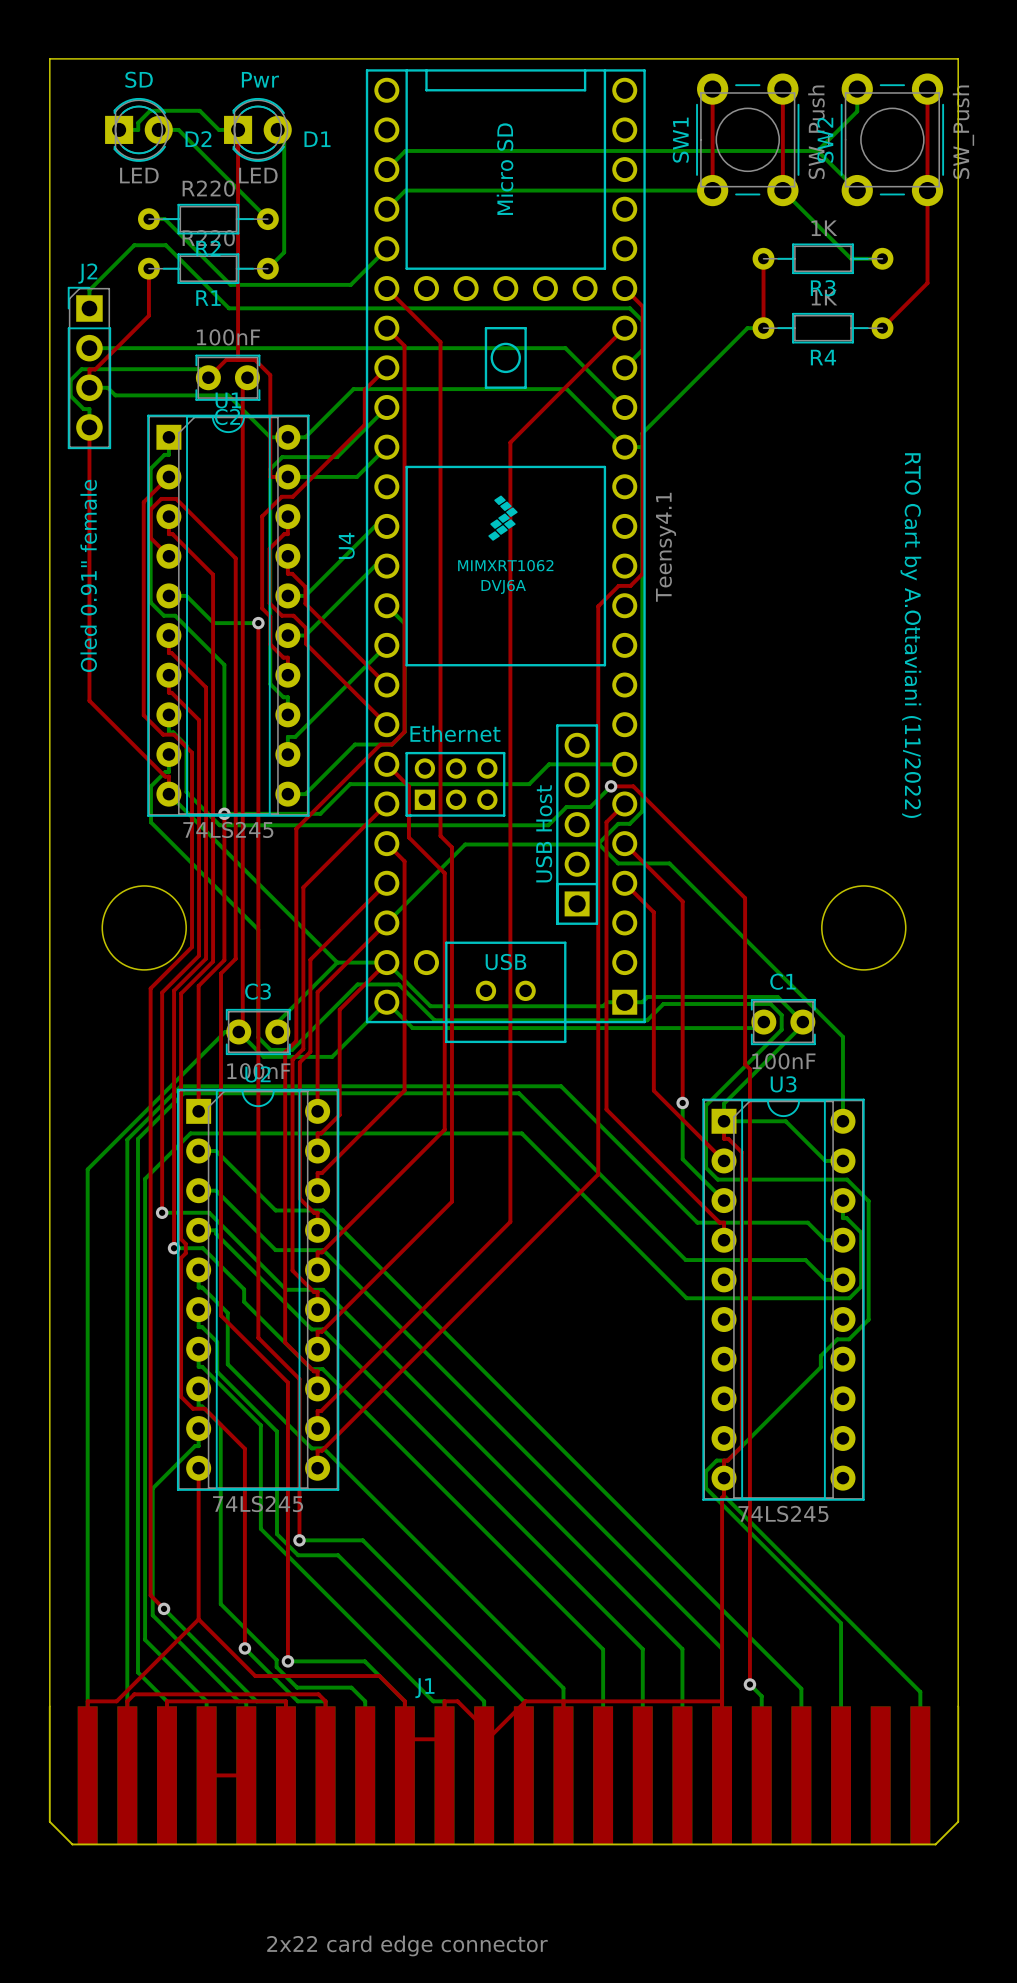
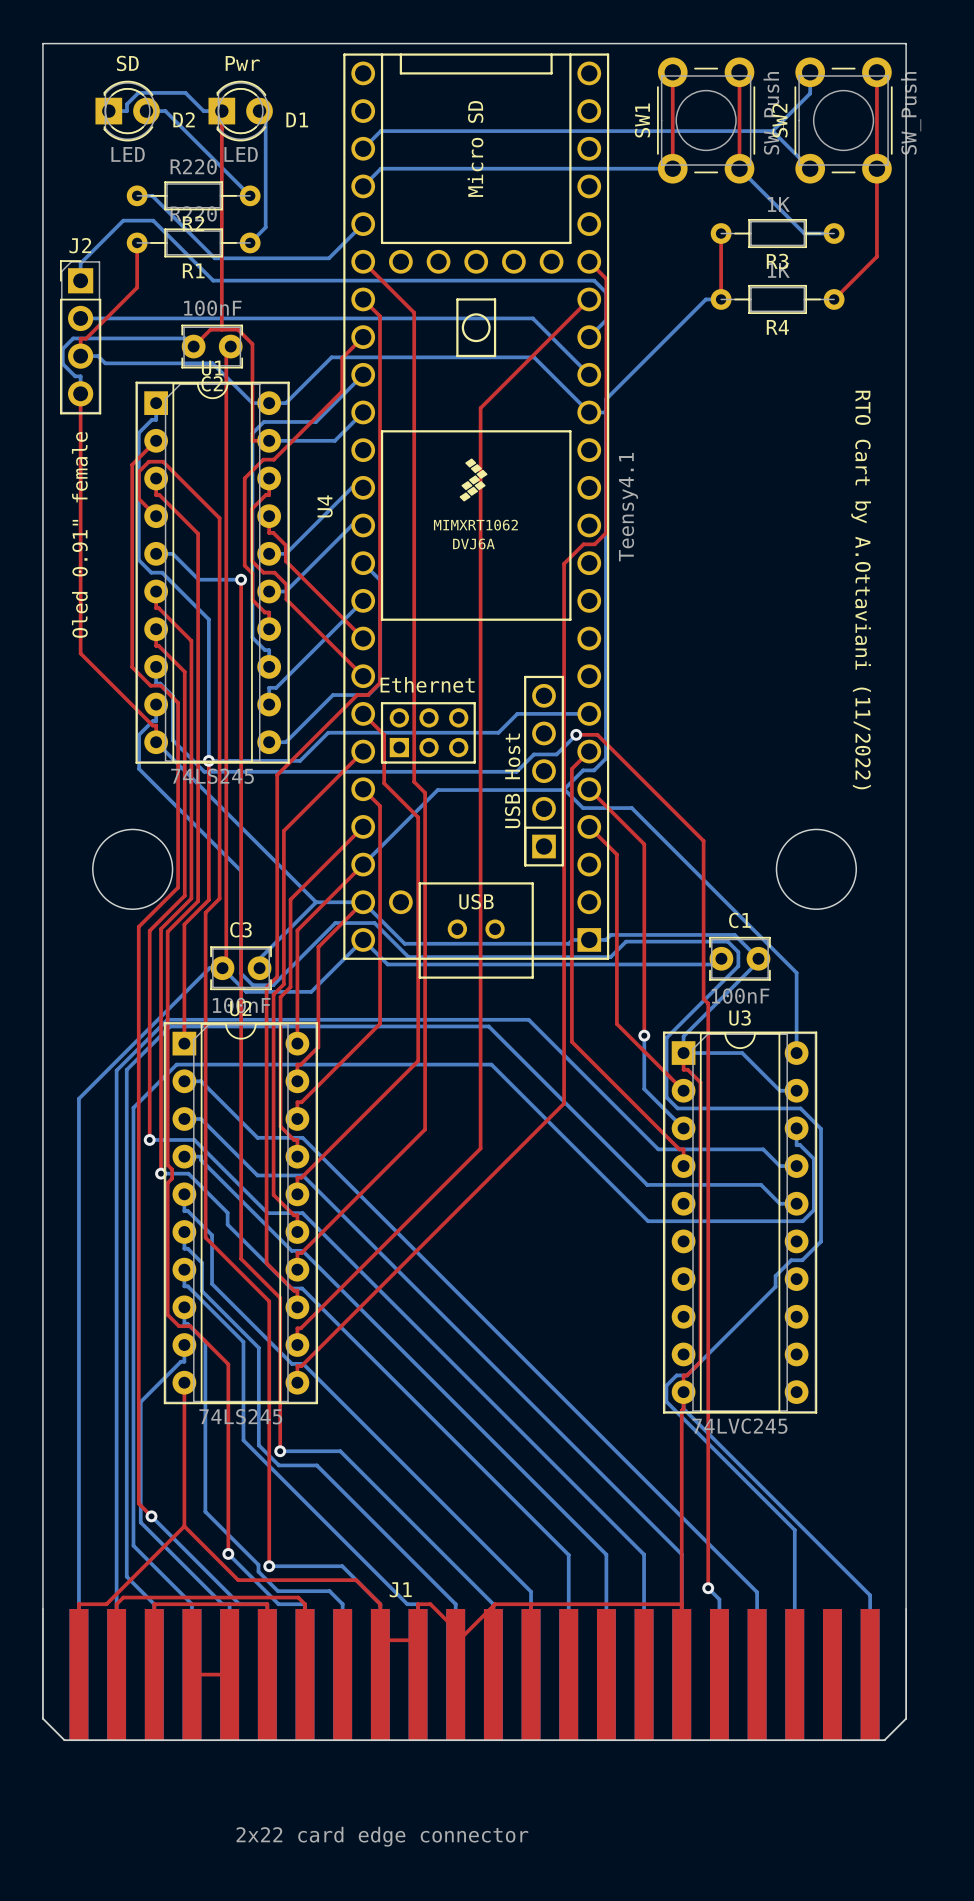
U3 value: 74LS245 (783, 1513) -> 74LVC245 (739, 1426)

